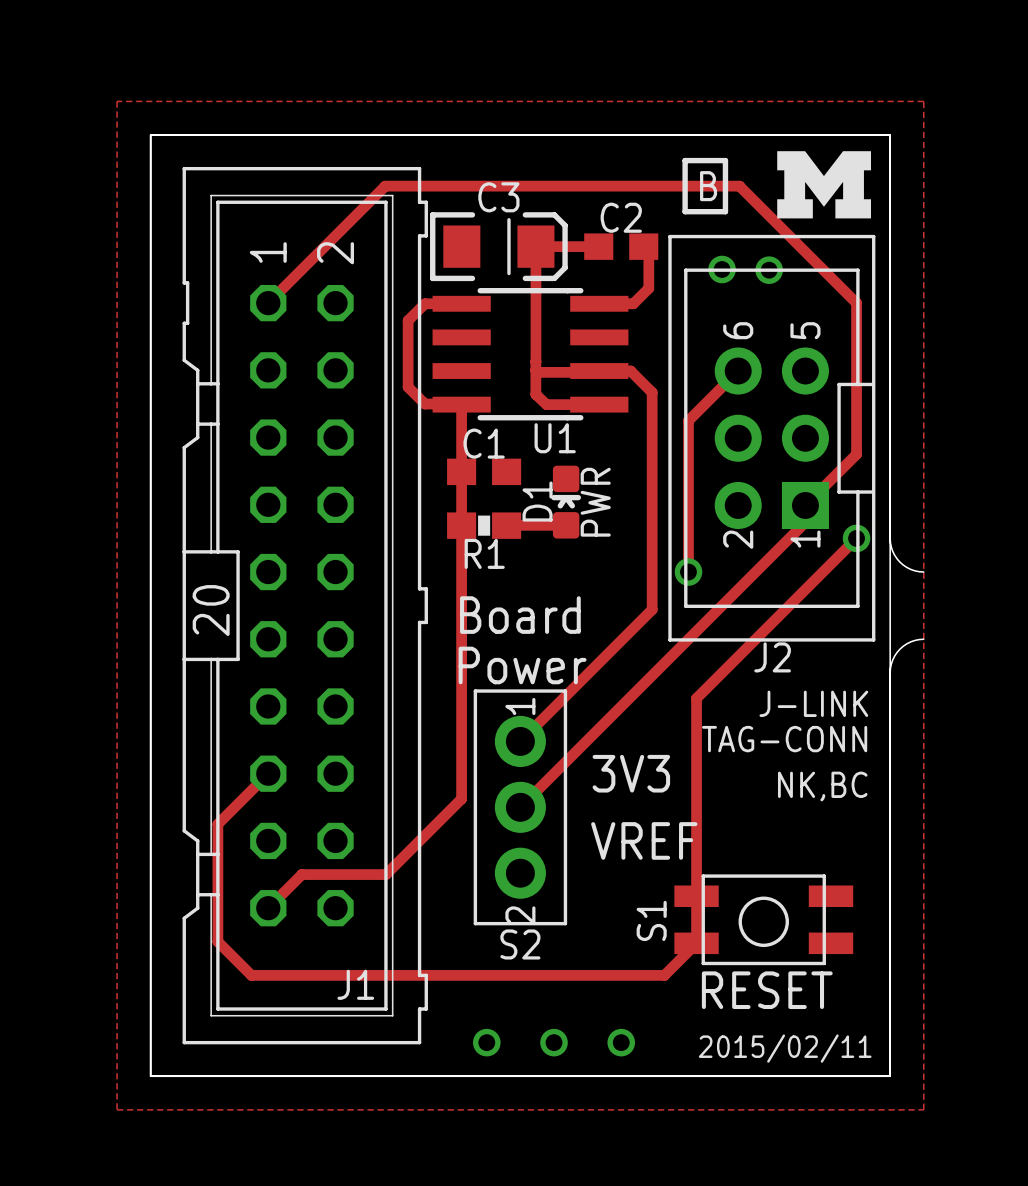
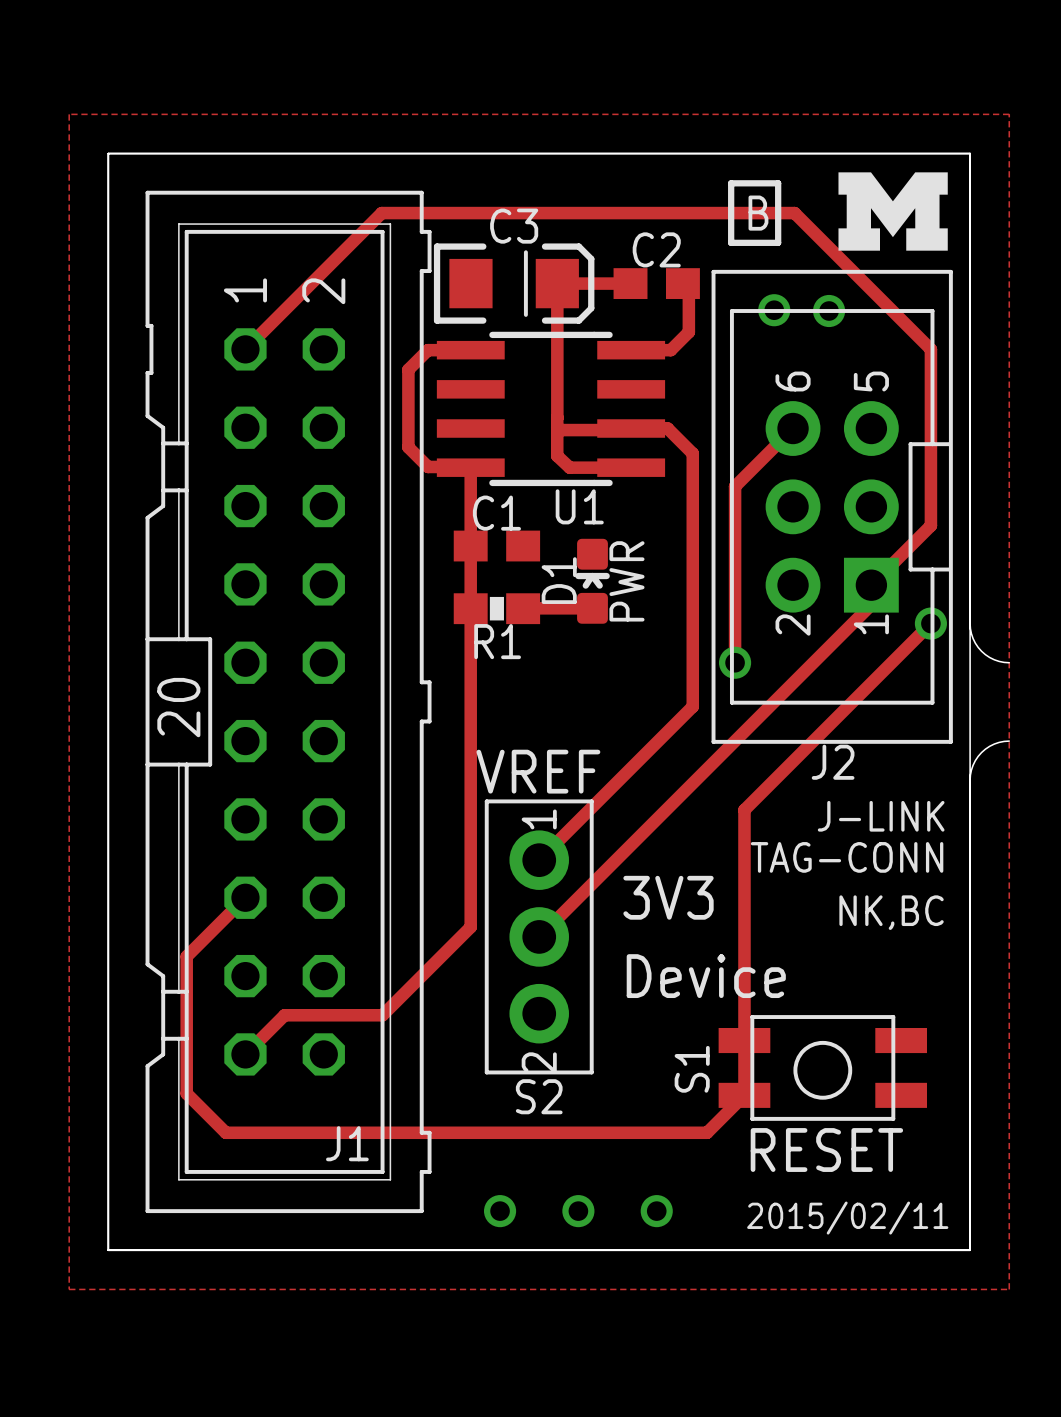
text: Board (520, 615) -> none
text: Power (522, 665) -> VREF (538, 771)
text: VREF (644, 840) -> Device (706, 976)

